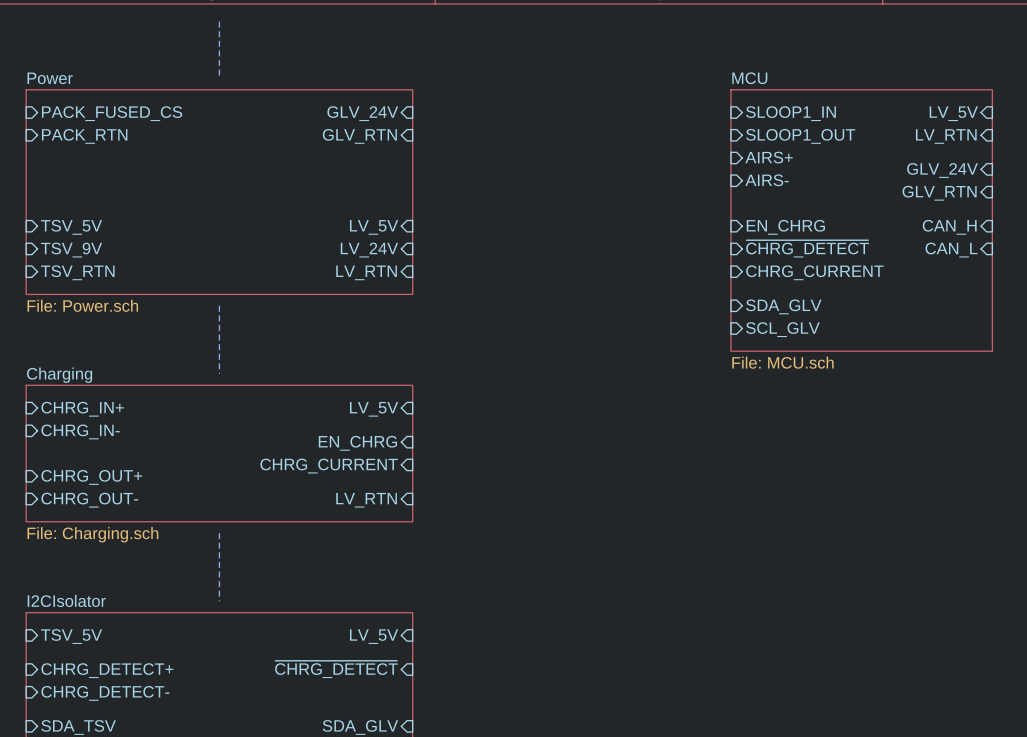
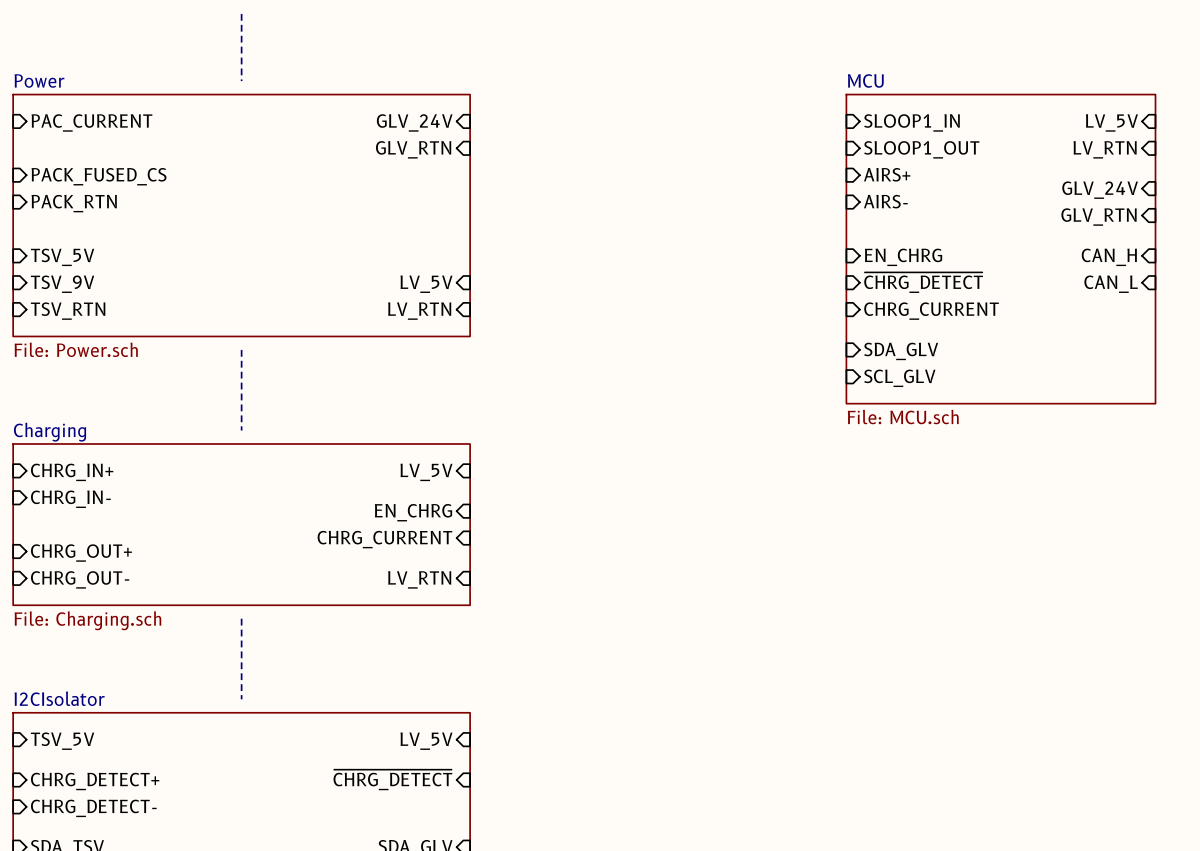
sheet pin: PACK_FUSED_CS (112, 113) -> PAC_CURRENT (91, 122)
sheet pin position: PACK_RTN (84, 136) -> PACK_RTN (74, 203)
sheet pin: none -> PACK_FUSED_CS (99, 176)
sheet pin: LV_5V (374, 227) -> none
sheet pin: LV_24V (369, 250) -> LV_5V (426, 284)

